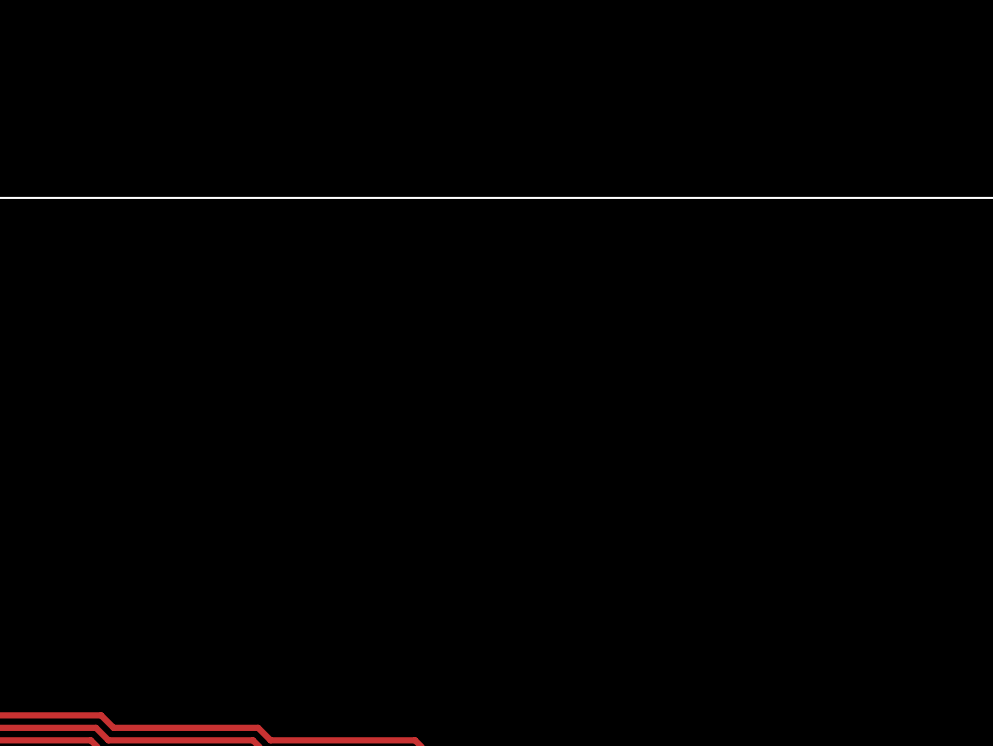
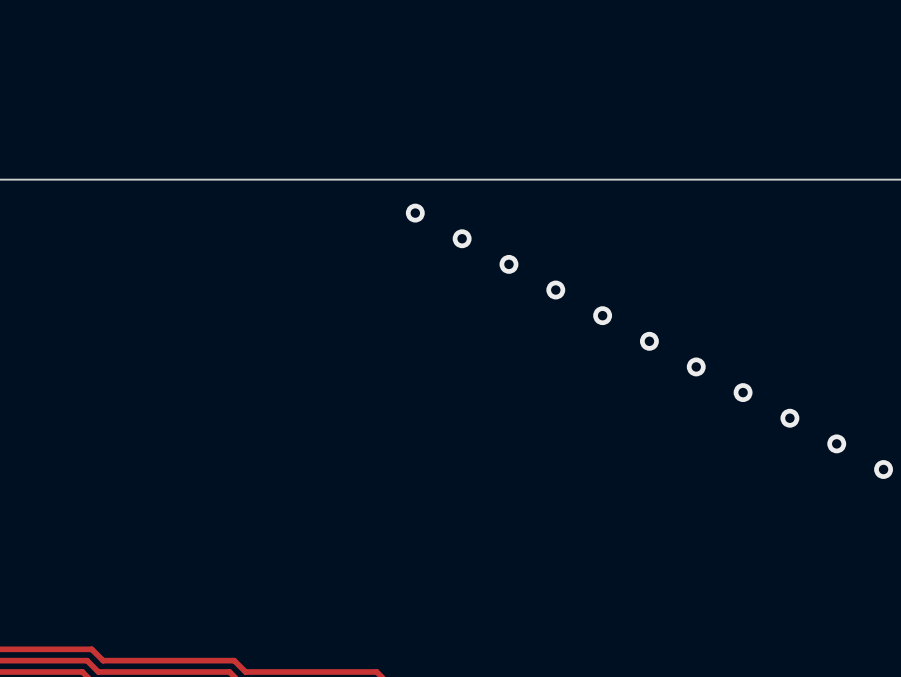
via: none -> (415, 213)
via: none -> (462, 238)
via: none -> (508, 264)
via: none -> (555, 290)
via: none -> (602, 315)
via: none -> (649, 341)
via: none -> (696, 366)
via: none -> (743, 392)
via: none -> (789, 418)
via: none -> (836, 443)
via: none -> (883, 469)

